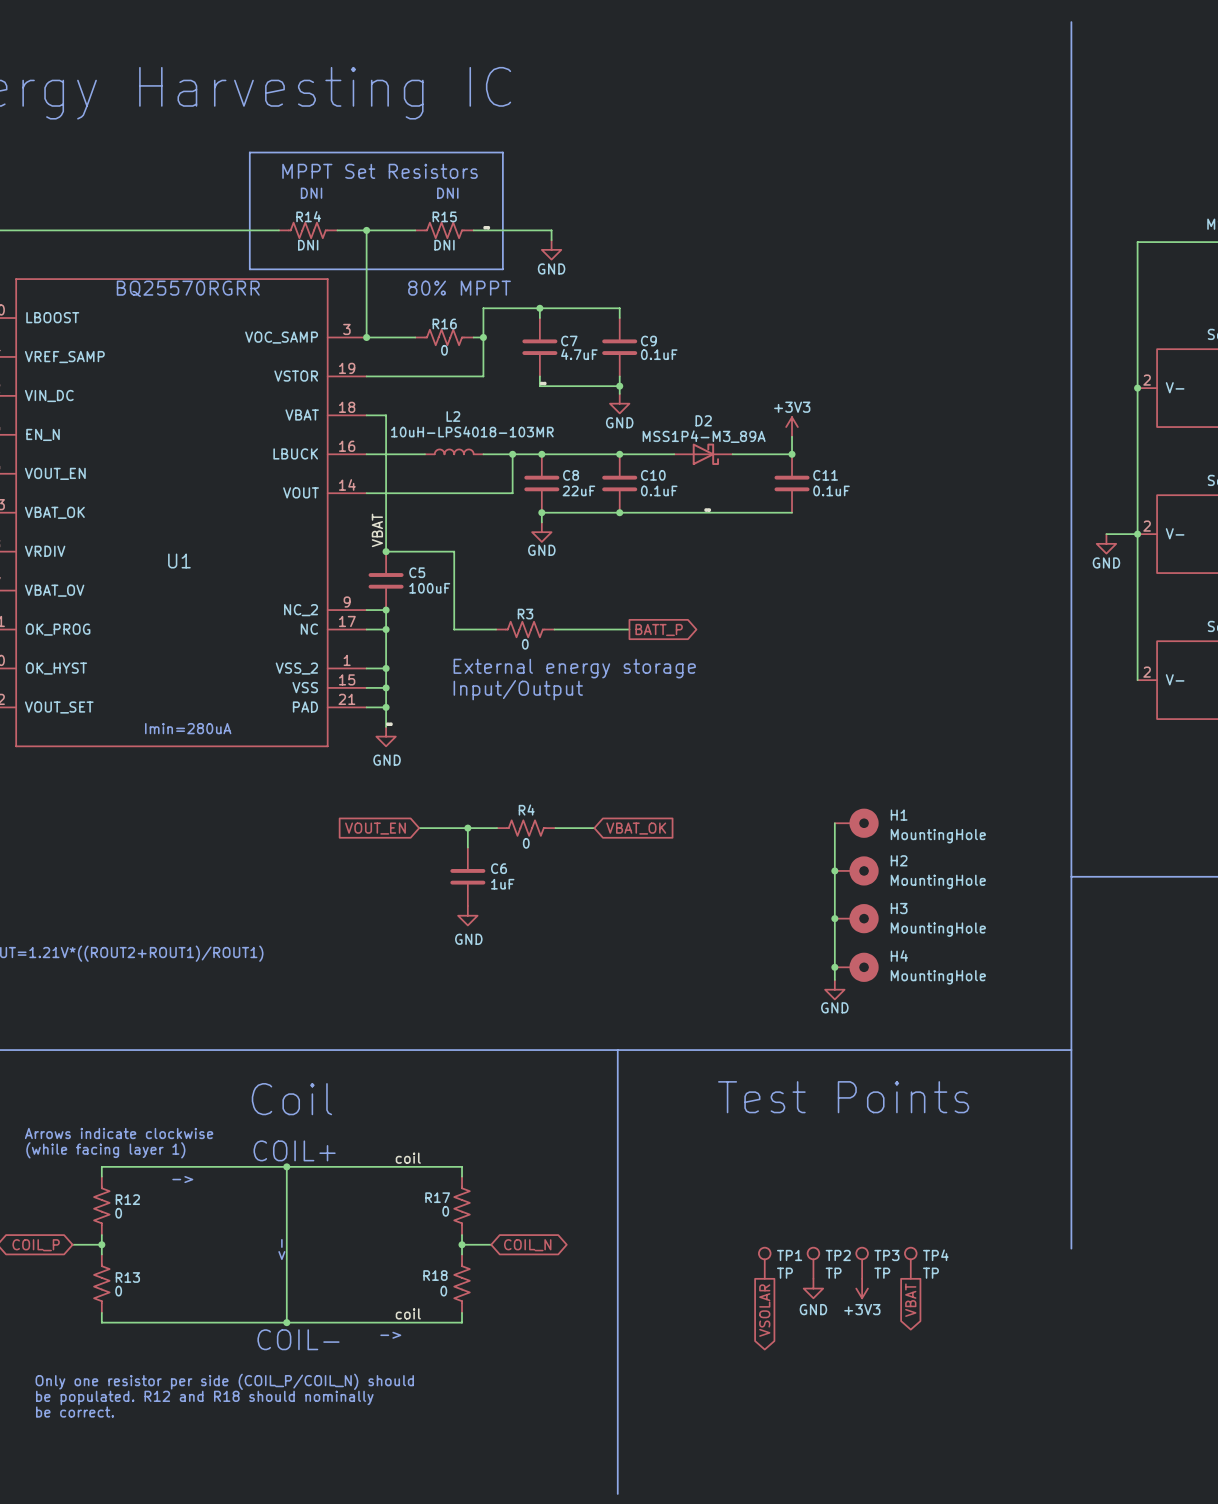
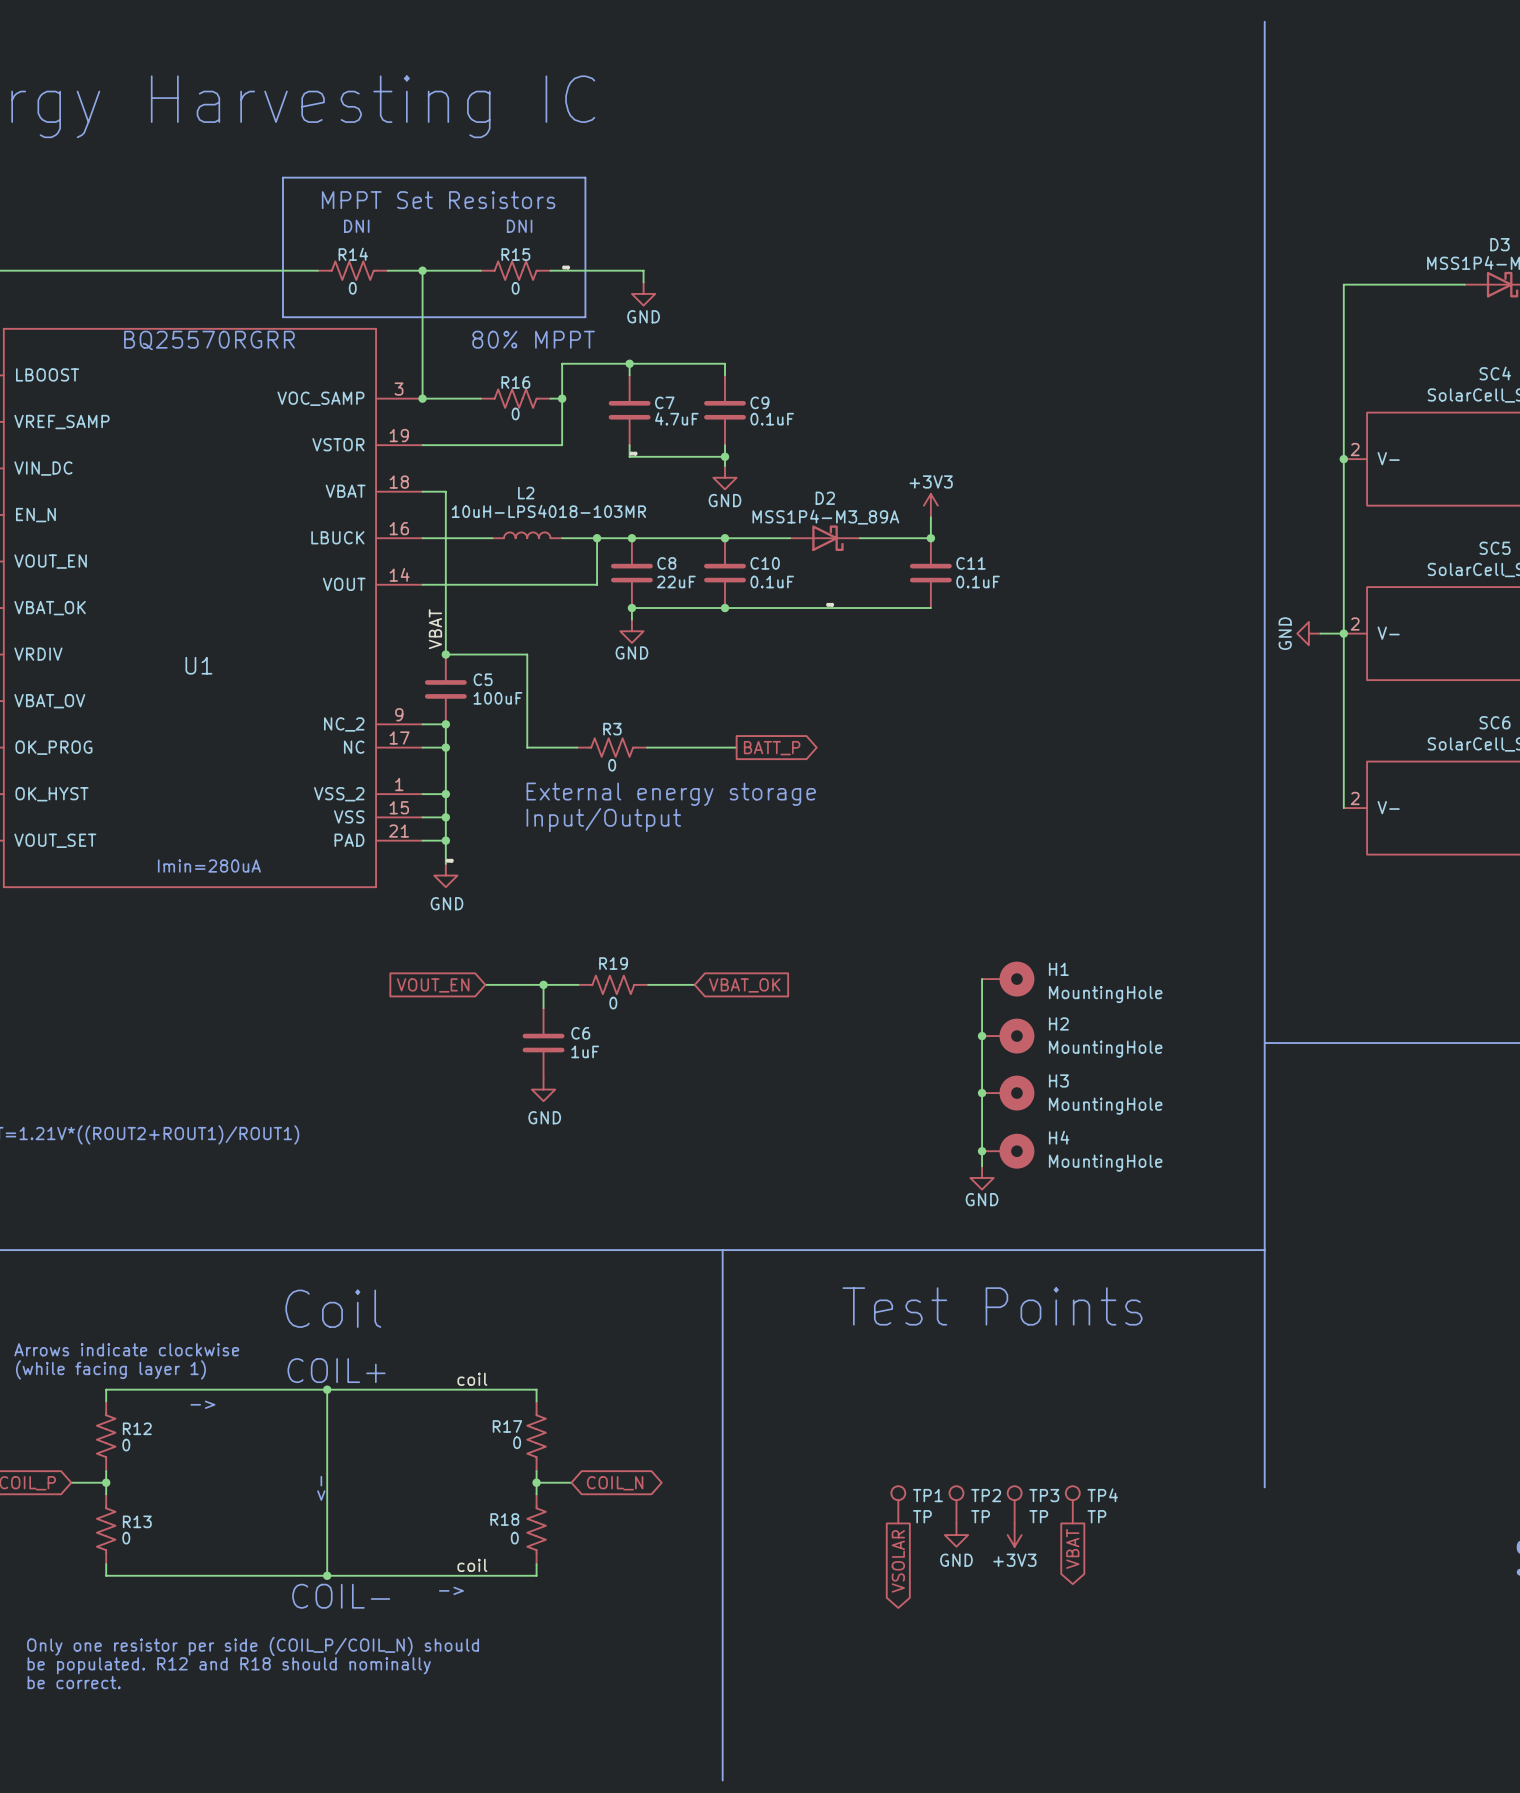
R14 value: DNI (308, 245) -> 0 (352, 288)
R15 value: DNI (444, 245) -> 0 (515, 288)
power symbol rotation: 0° (1106, 543) -> 90° clockwise (1308, 633)
R4 name: R4 (526, 810) -> R19 (613, 963)

